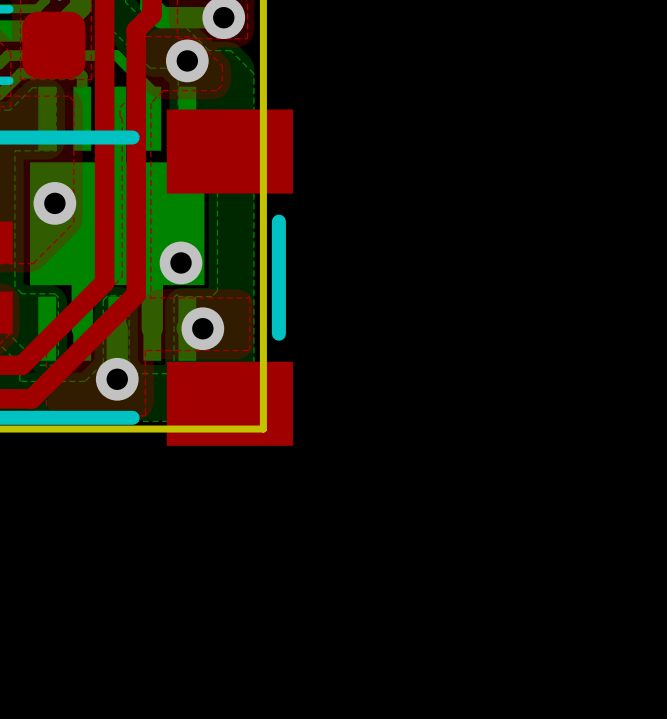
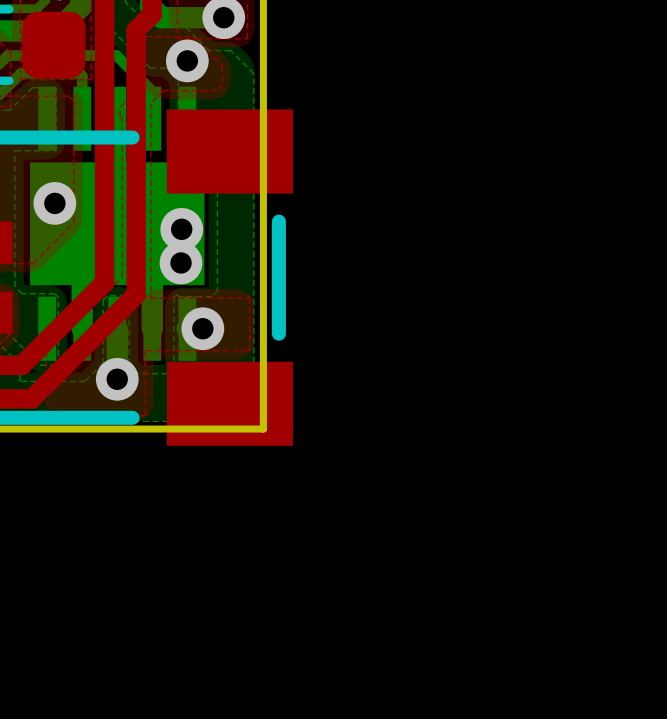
via: none -> (181, 229)

